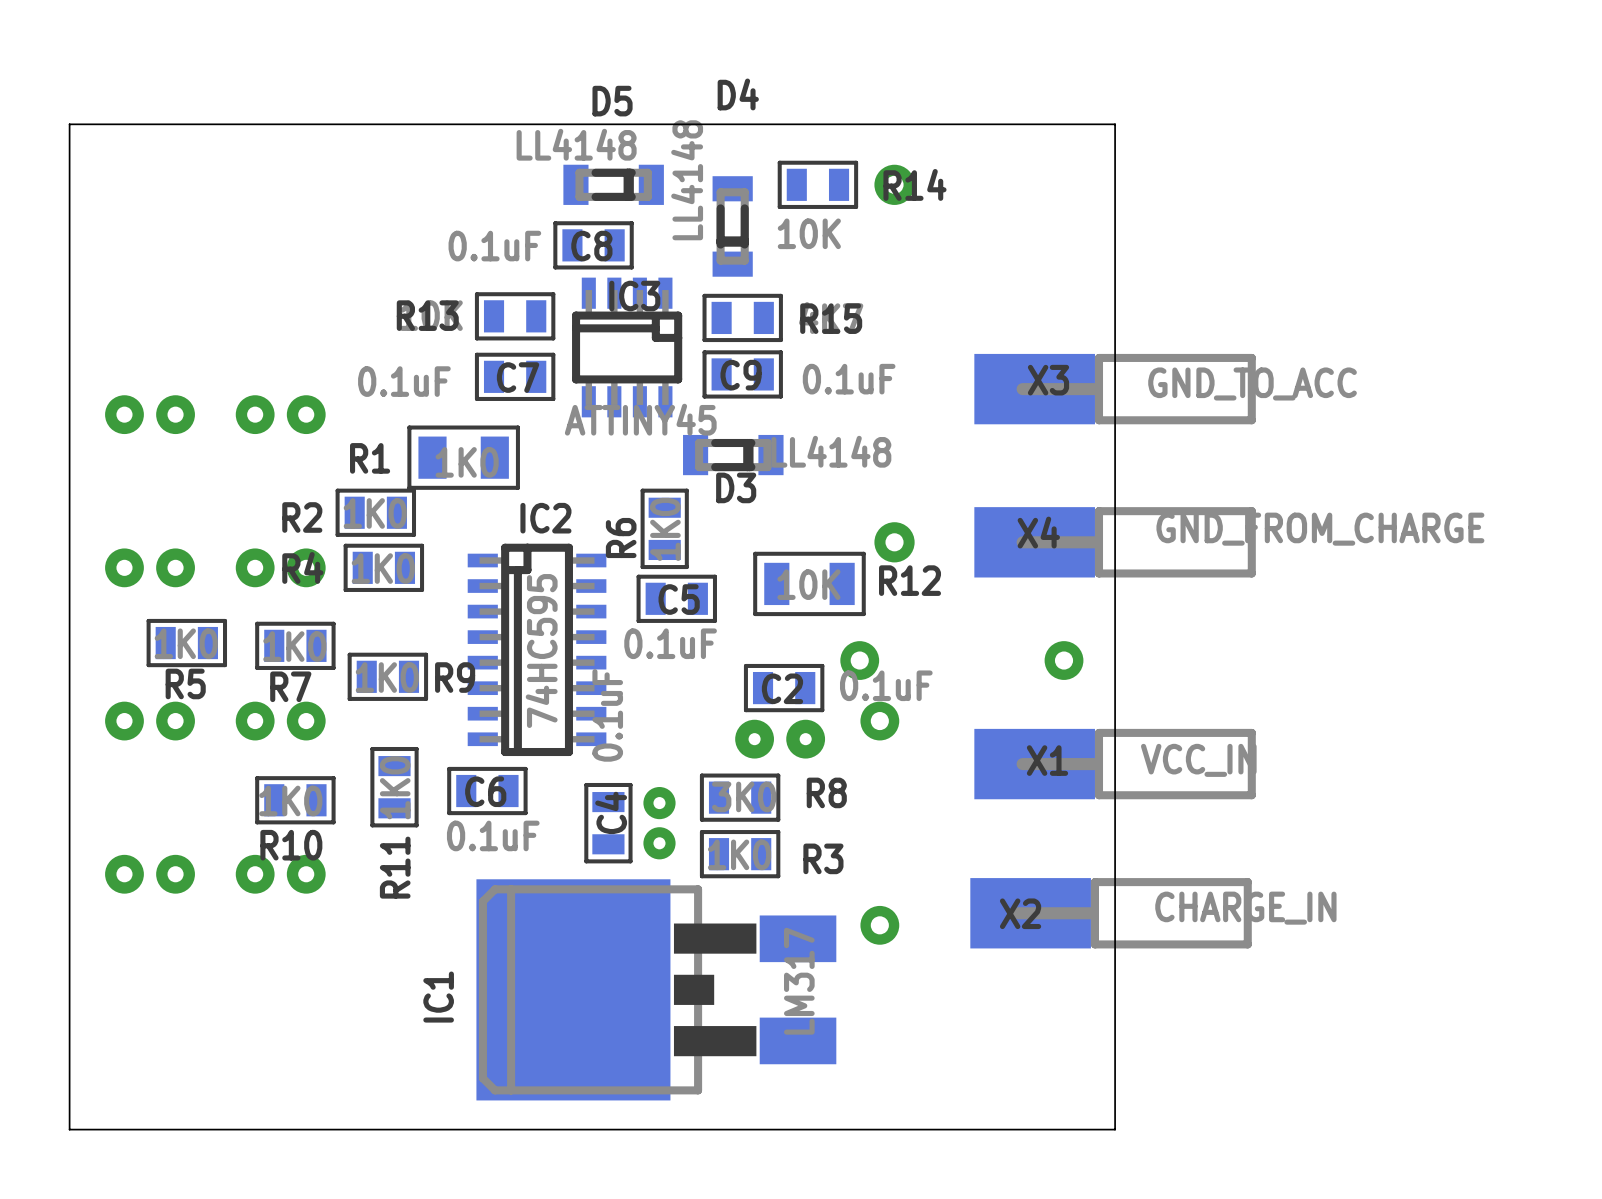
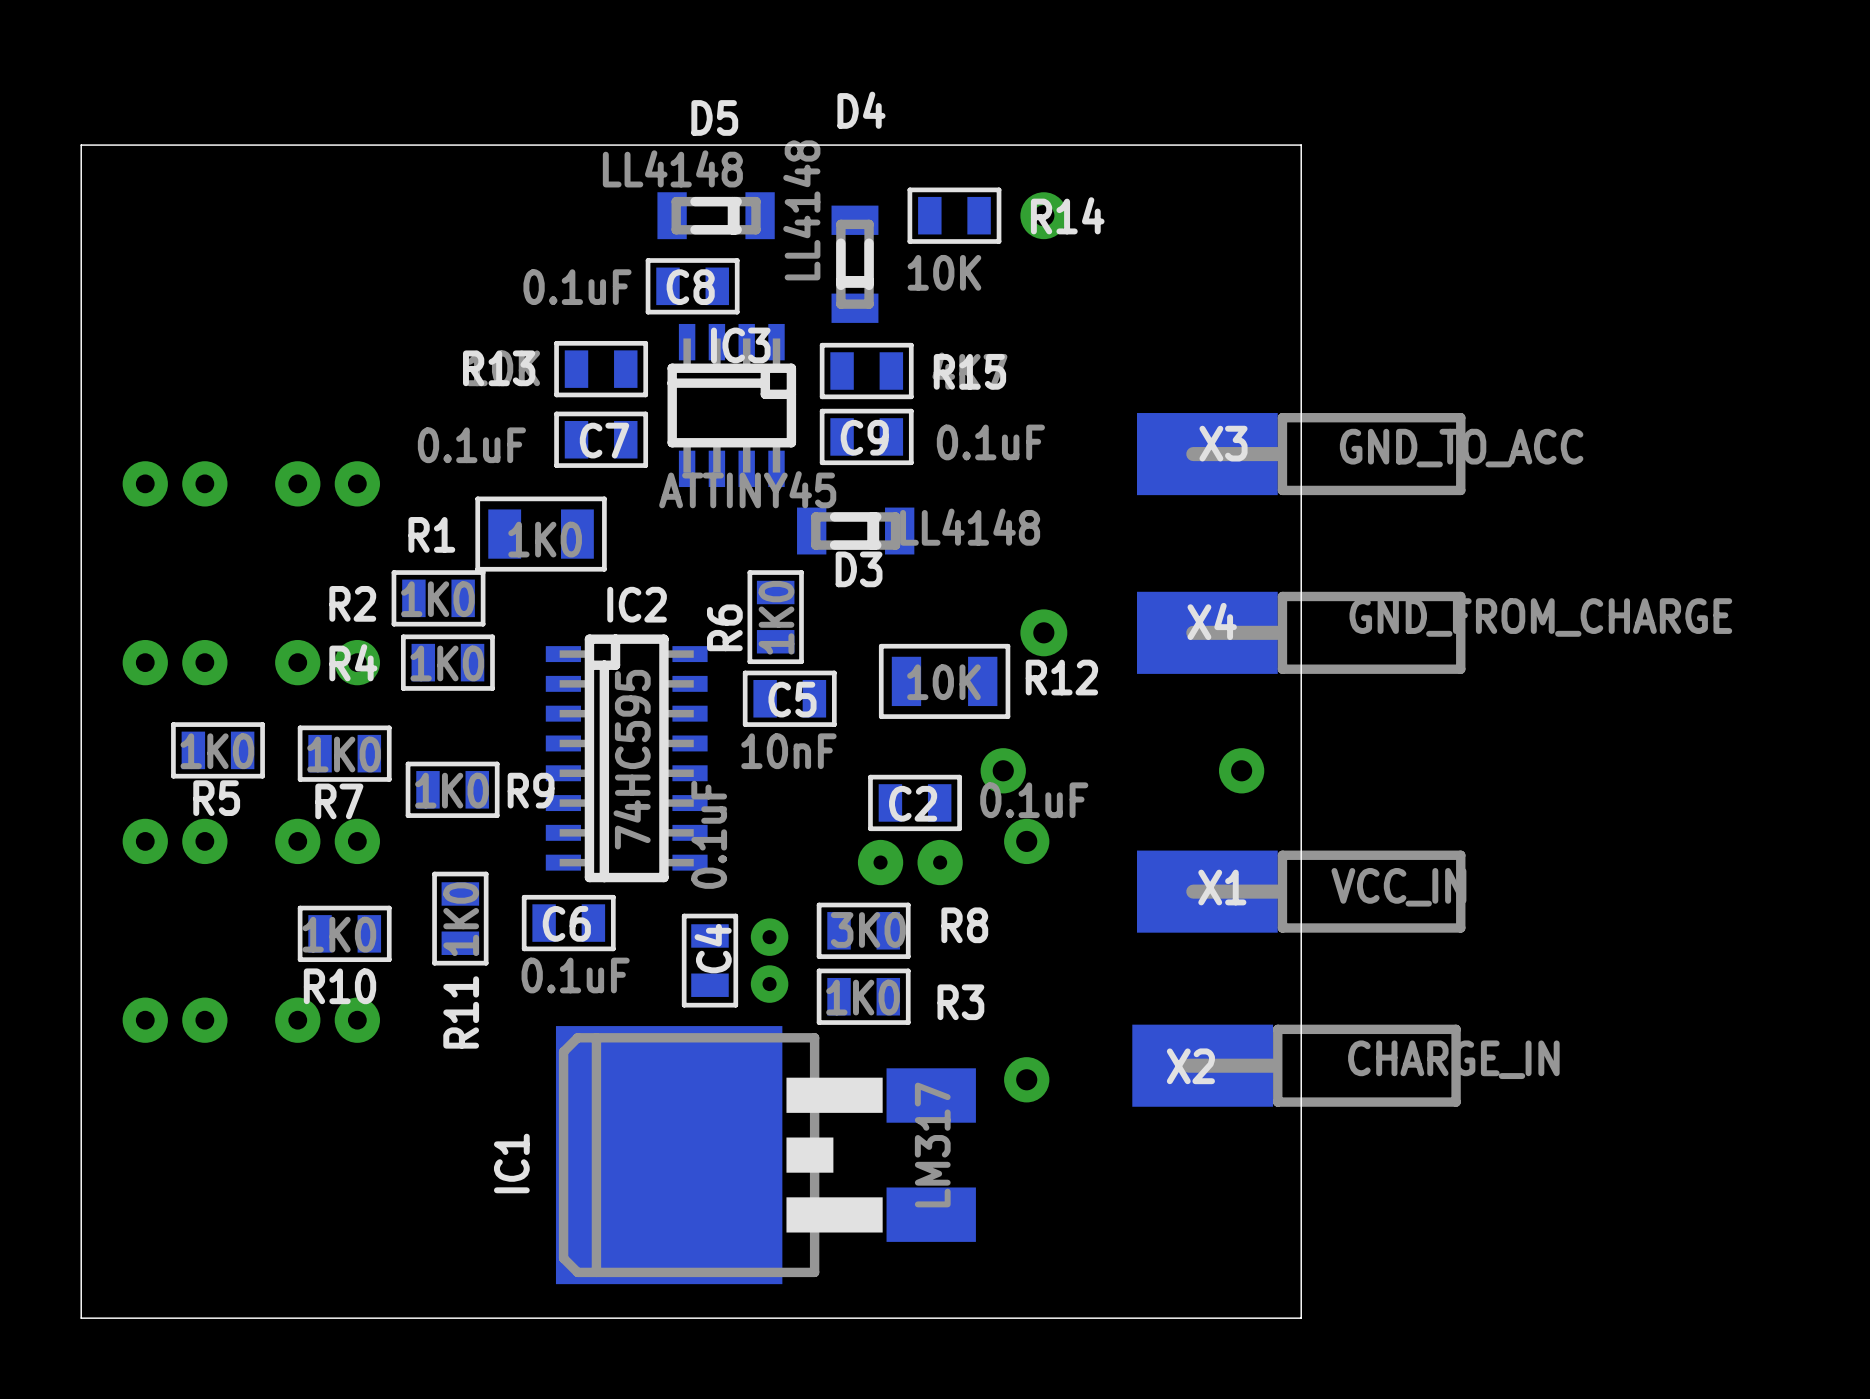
C5 value: 0.1uF (670, 643) -> 10nF (788, 751)

